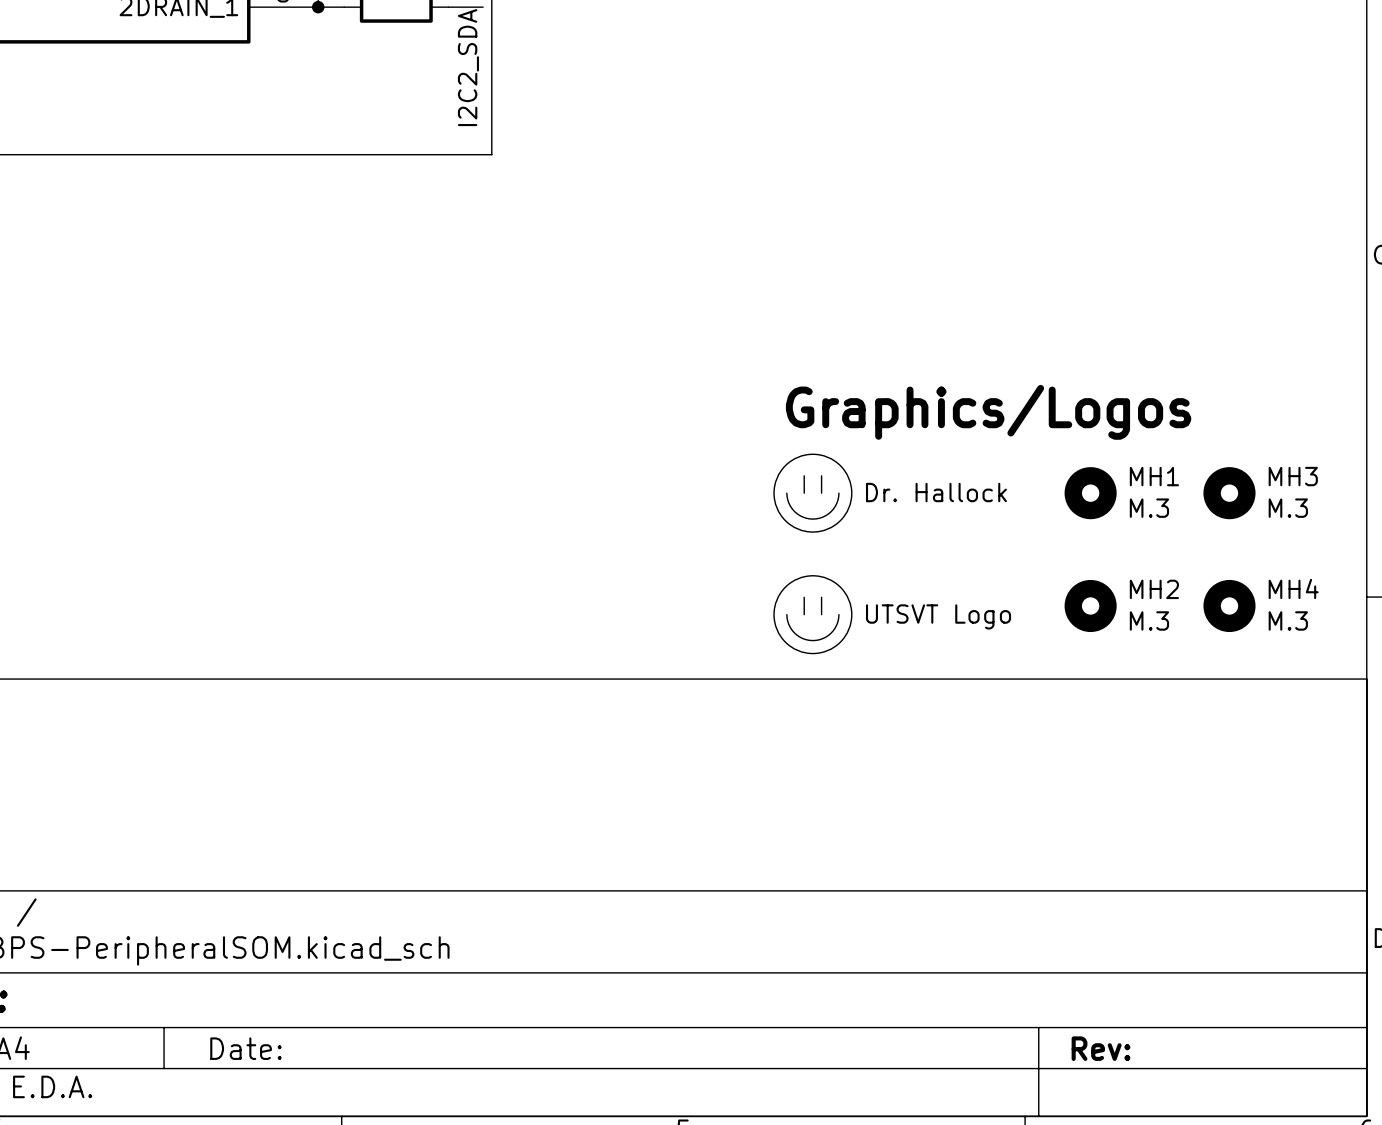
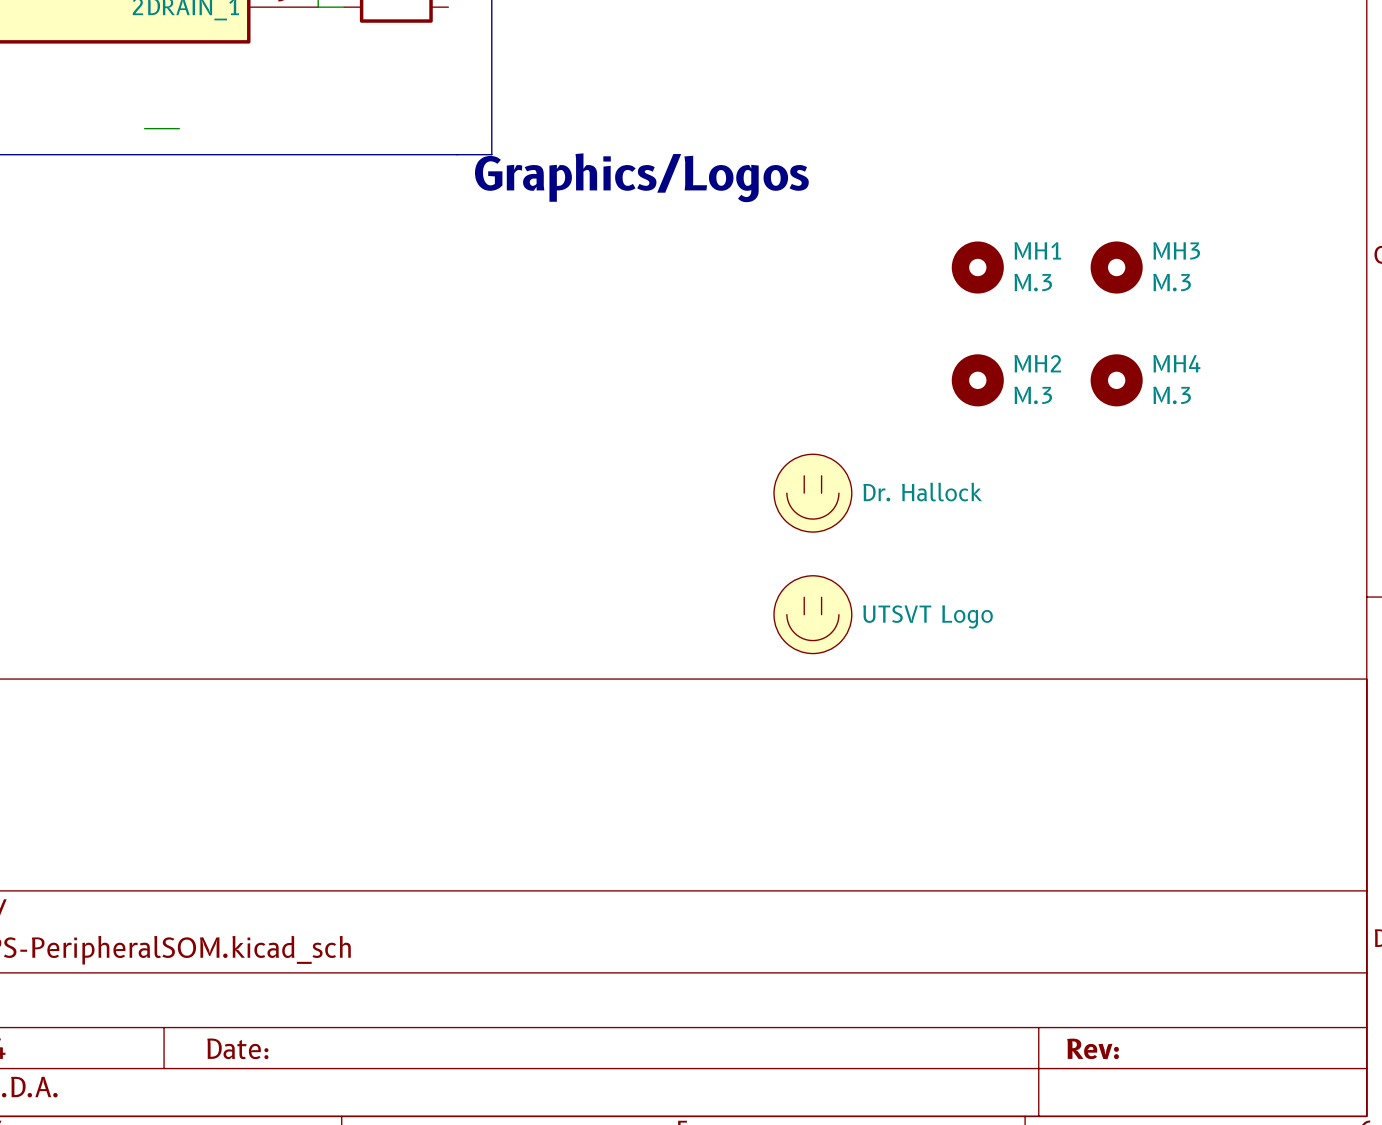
junction: (318, 7) -> none
wire: (448, 7) (483, 7) -> (144, 128) (179, 128)
label: I2C2_SDA (468, 67) -> none
text: none -> Graphics/Logos (641, 177)
text: Graphics/Logos (988, 412) -> none
MH1 position: (1090, 493) -> (977, 267)
MH3 position: (1229, 493) -> (1116, 267)
MH2 position: (1090, 605) -> (977, 380)
MH4 position: (1229, 605) -> (1116, 380)

